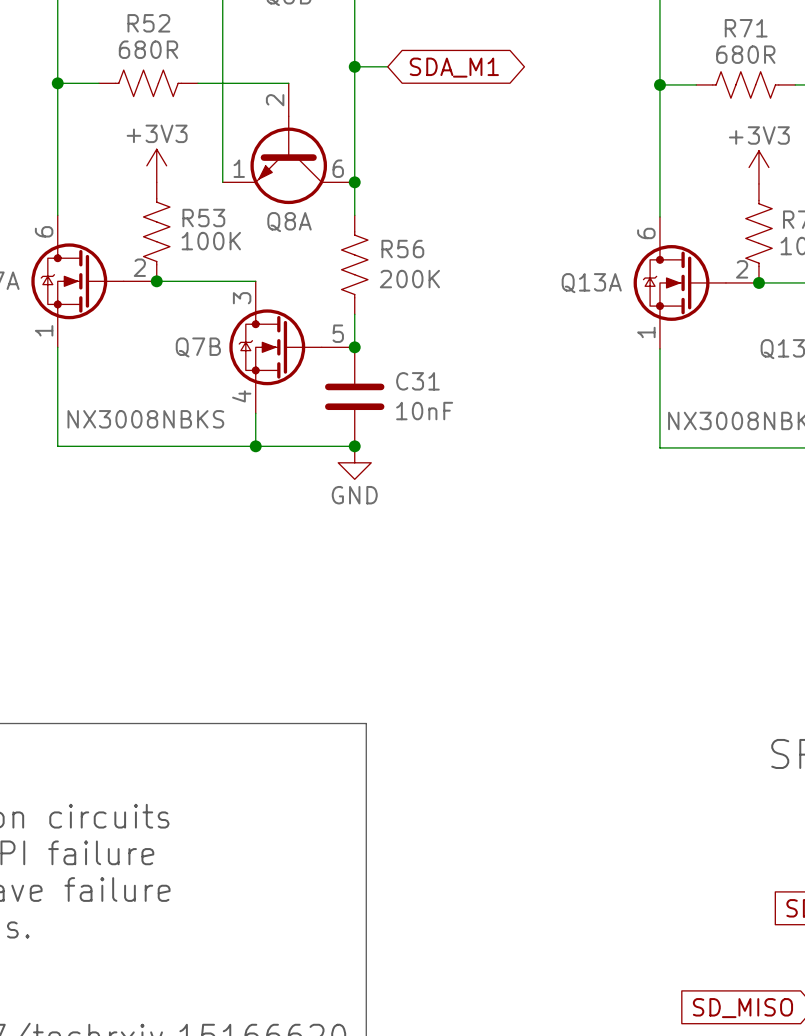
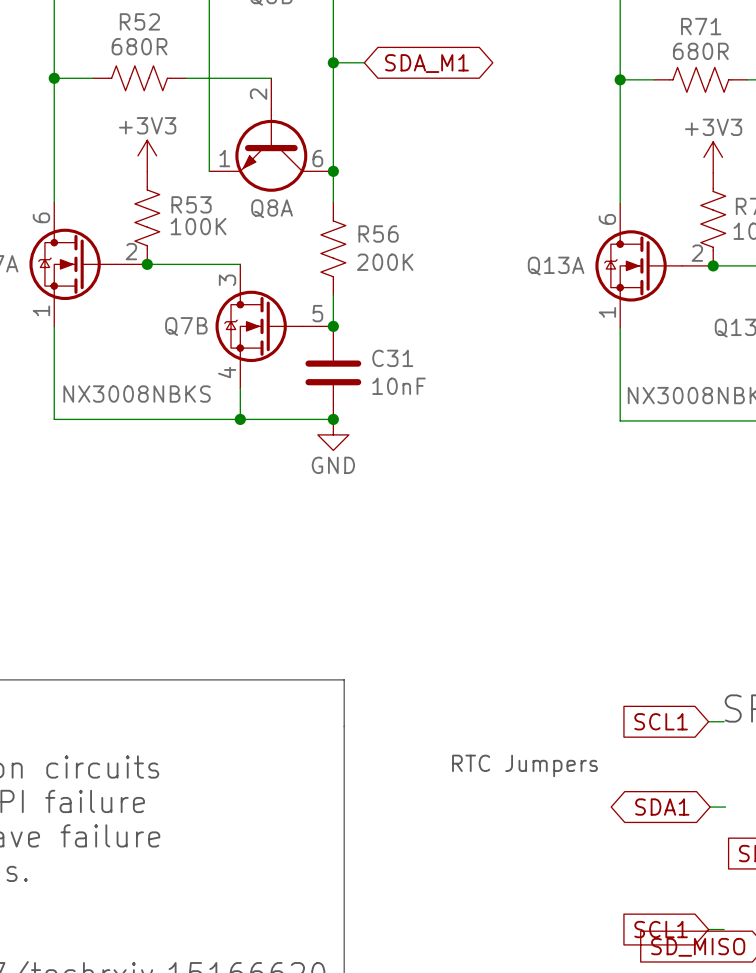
global label: none -> SCL1 (661, 721)
wire: none -> (708, 721) (724, 721)
text: none -> RTC Jumpers (524, 765)
global label: none -> SDA1 (662, 807)
wire: none -> (710, 807) (725, 807)
global label: none -> SCL1 (661, 929)
wire: none -> (708, 929) (724, 929)

